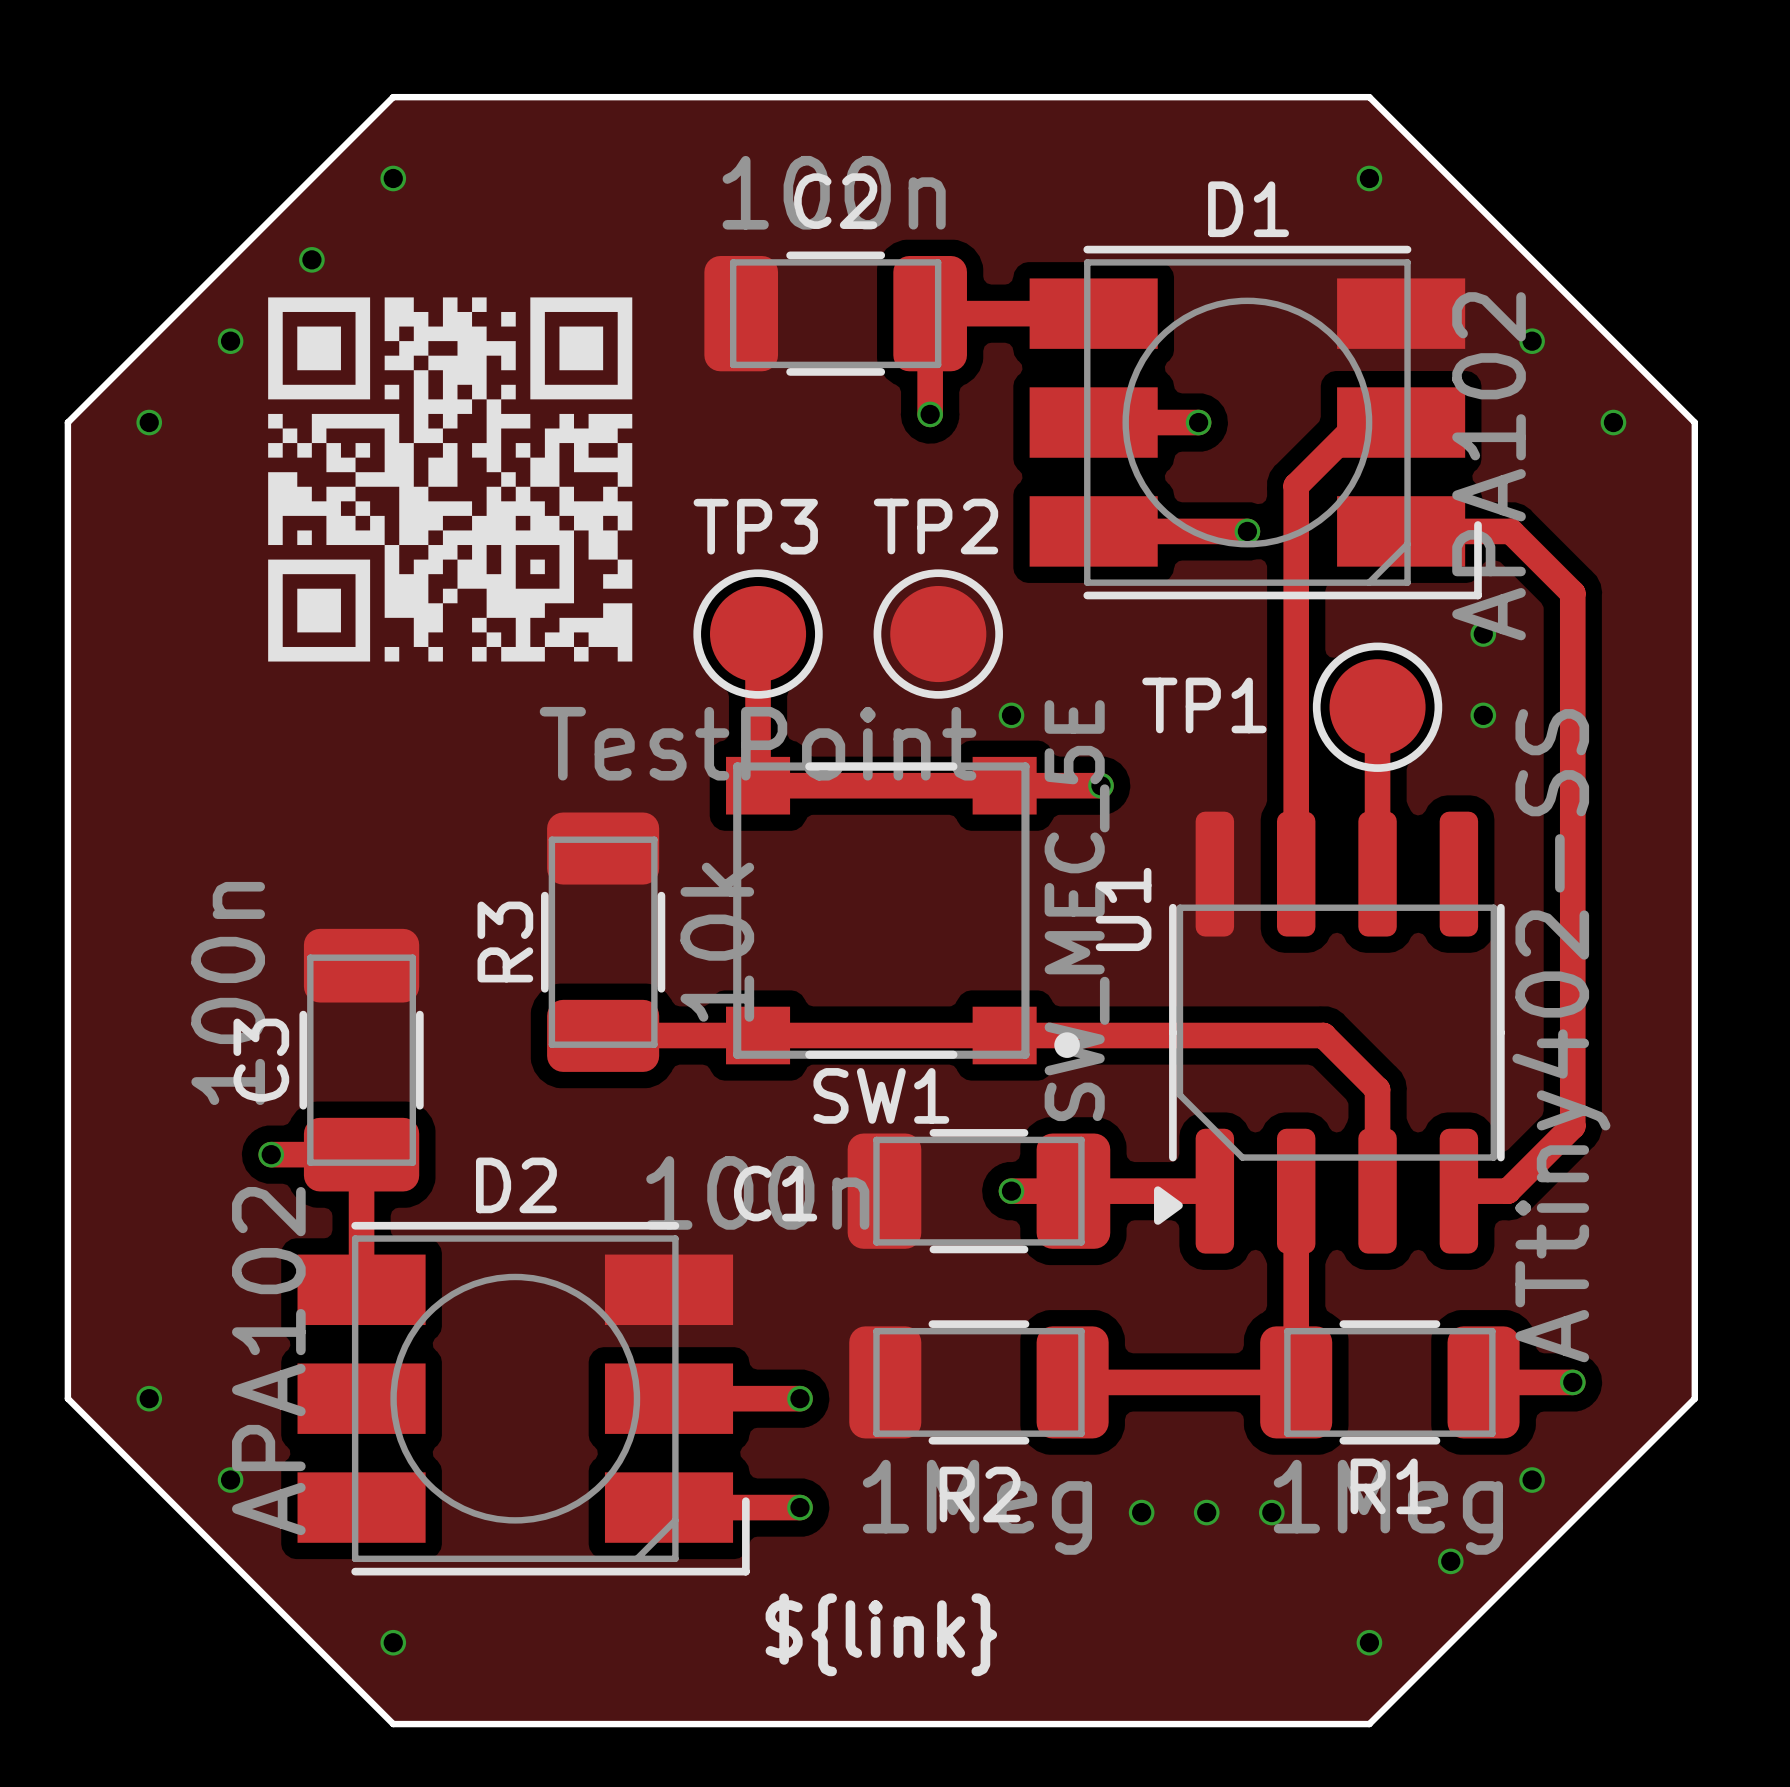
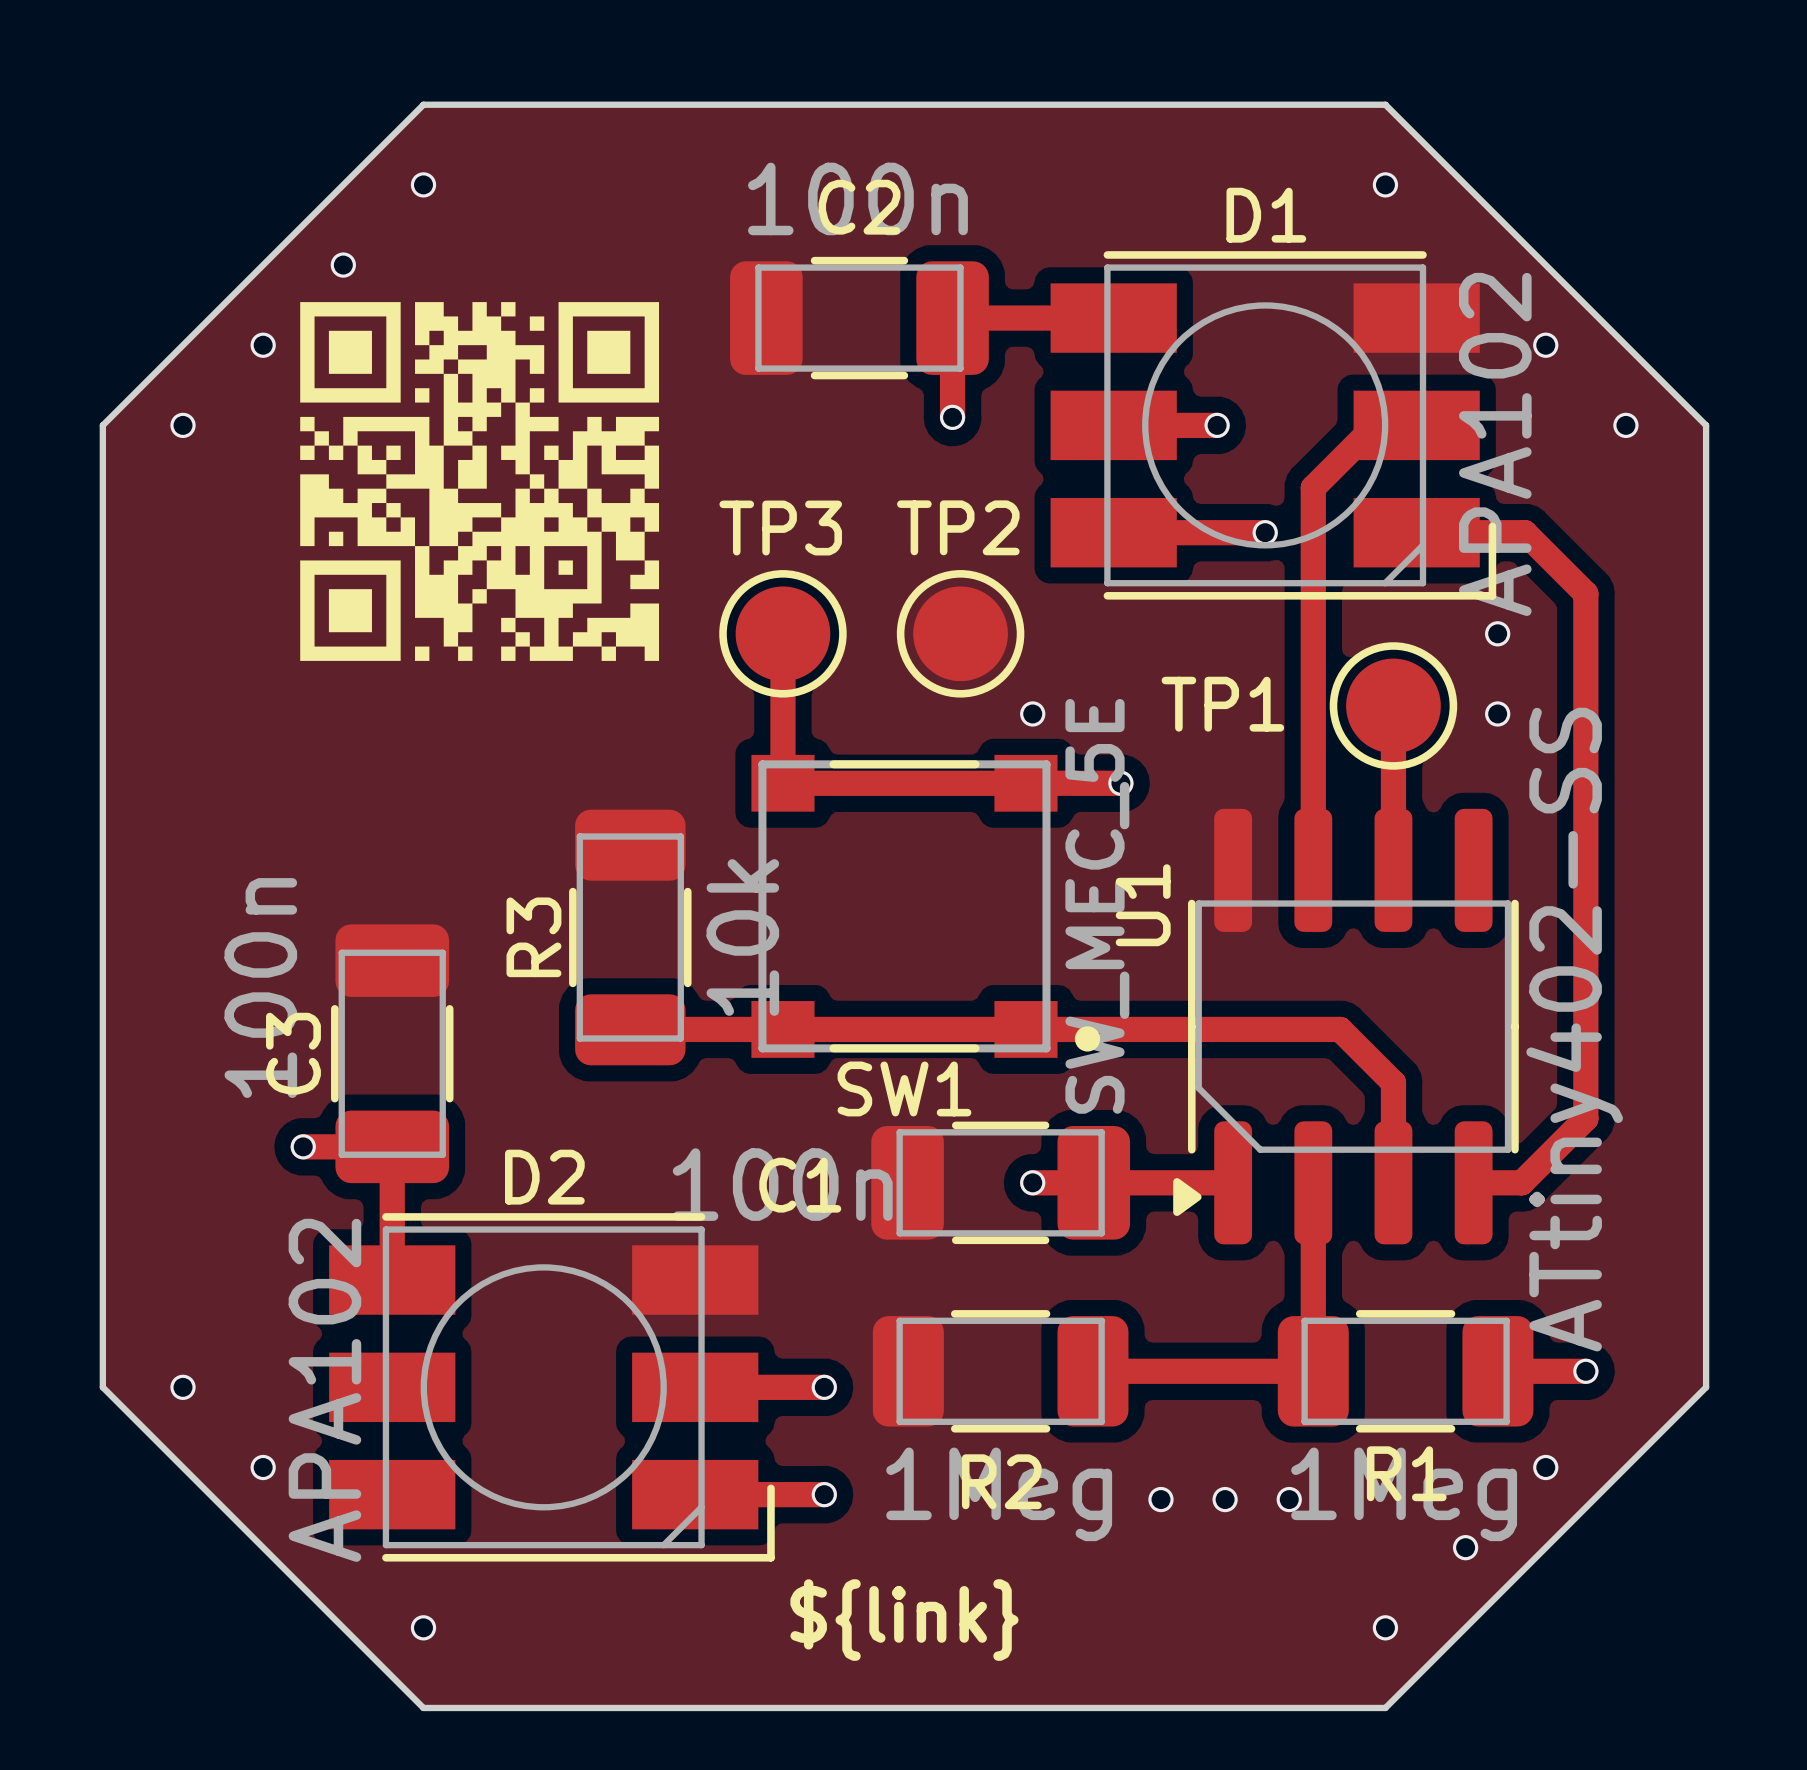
D1 value position: APA102 (1489, 466) -> APA102 (1495, 444)
TP3 value: TestPoint (758, 743) -> none
D2 value position: APA102 (268, 1361) -> APA102 (324, 1390)

